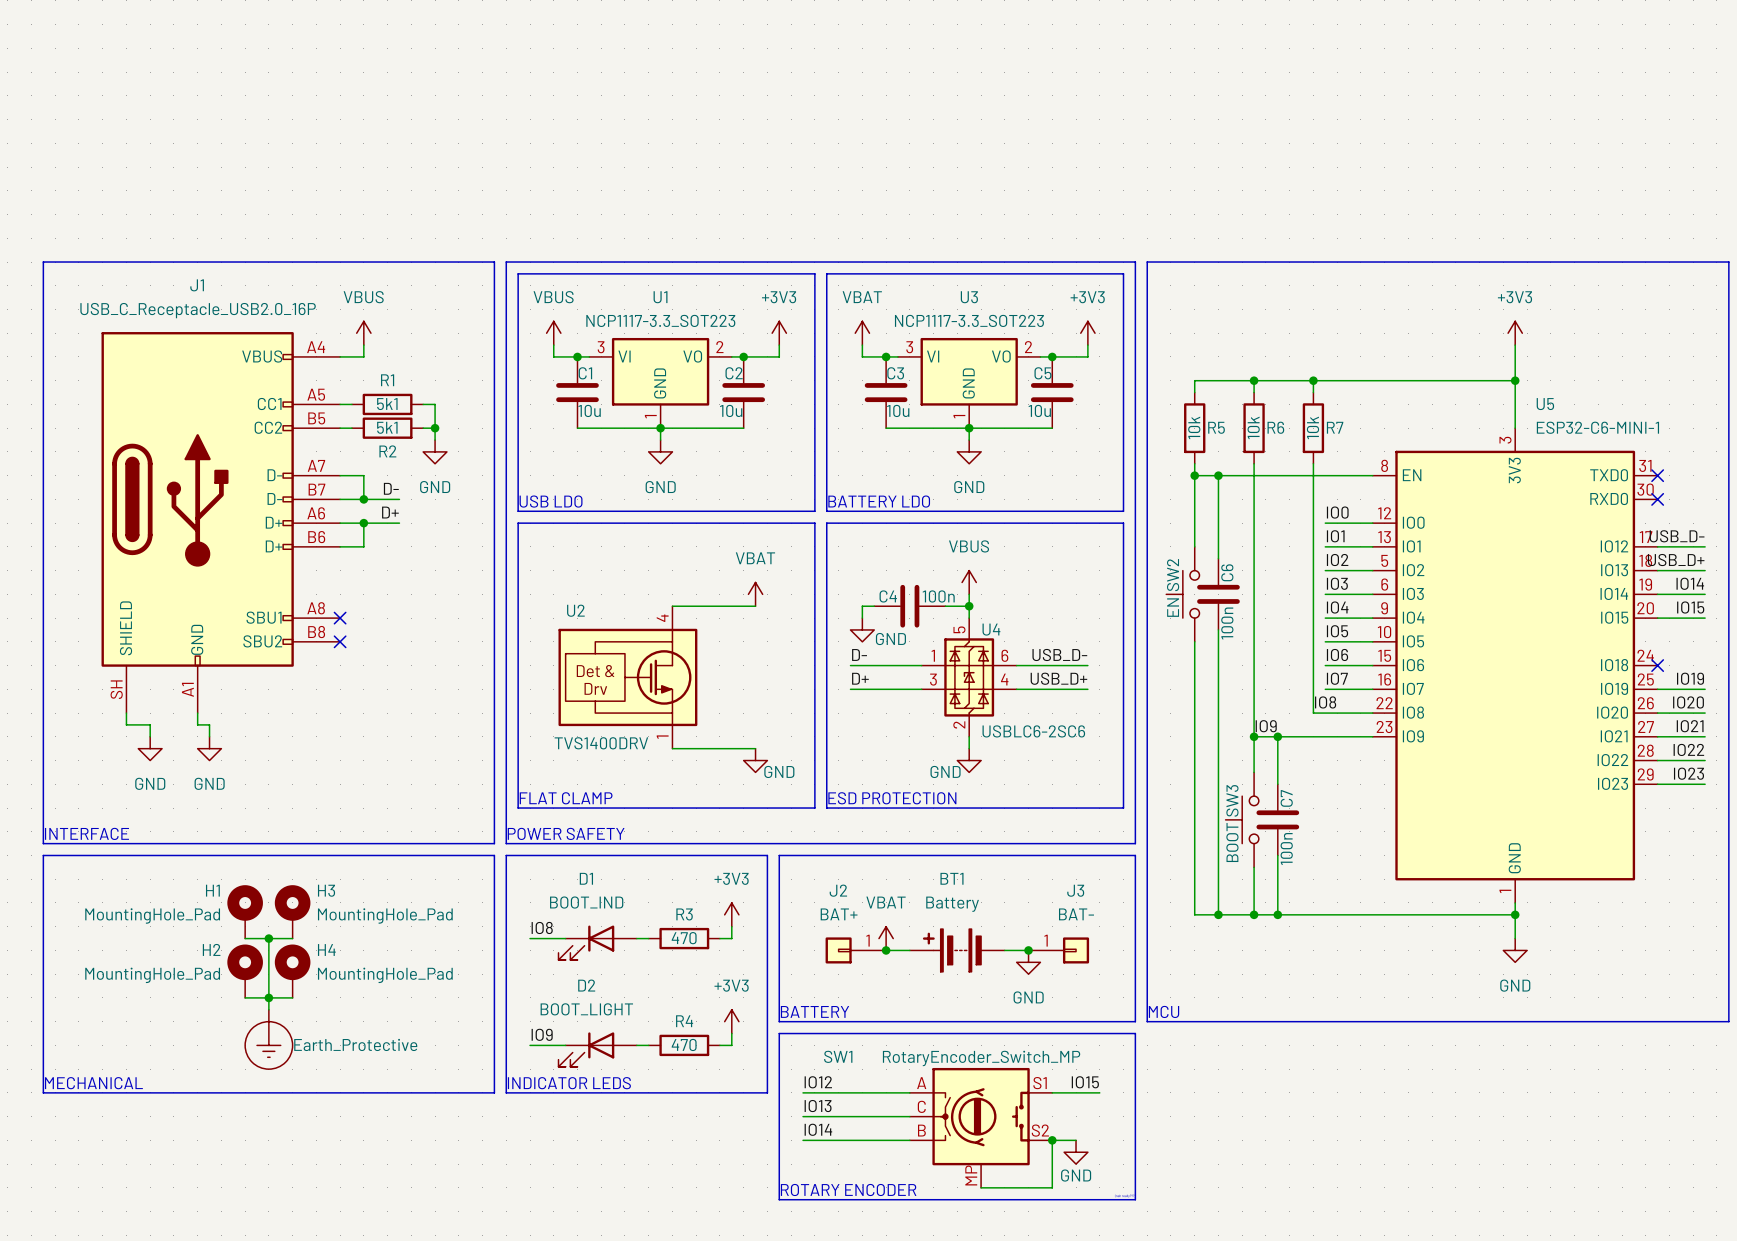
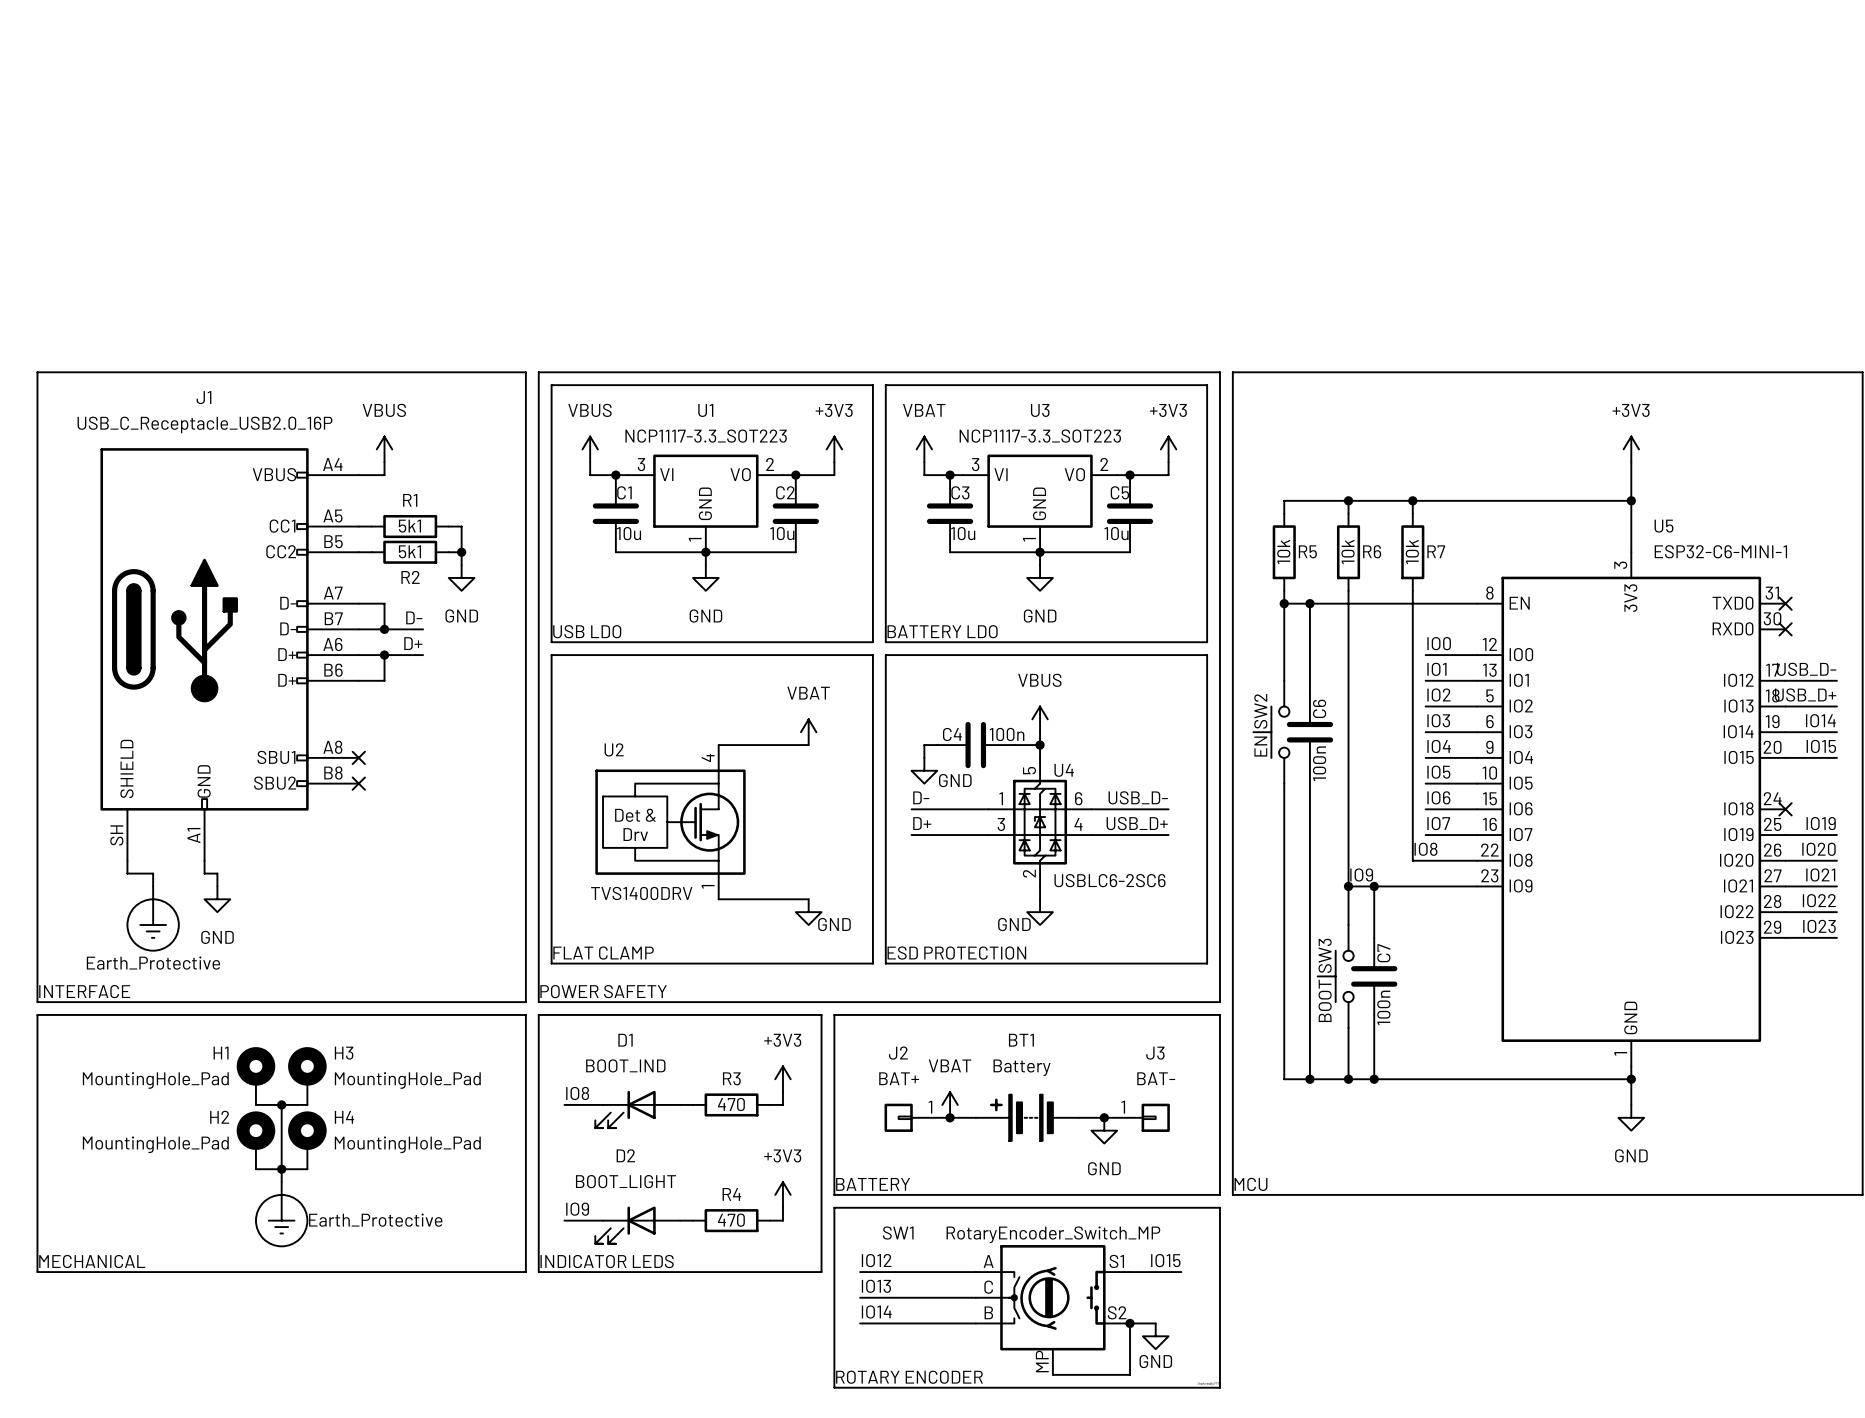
power symbol: GND (150, 748) -> none
power symbol: none -> Earth_Protective (153, 918)

